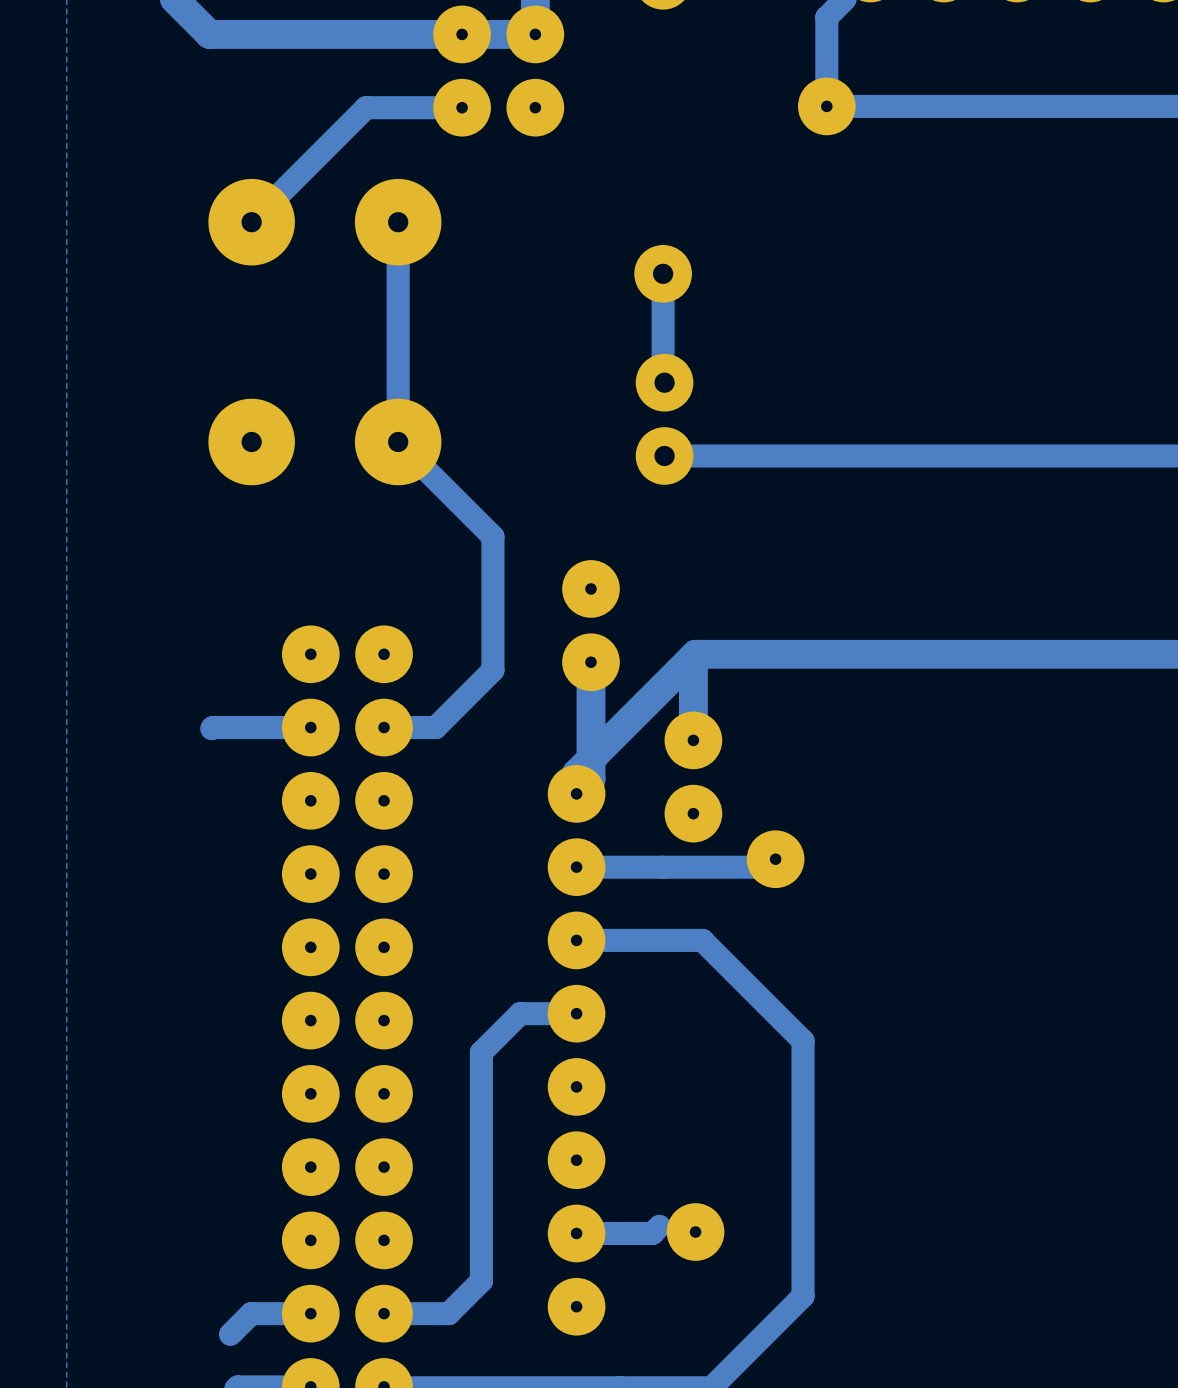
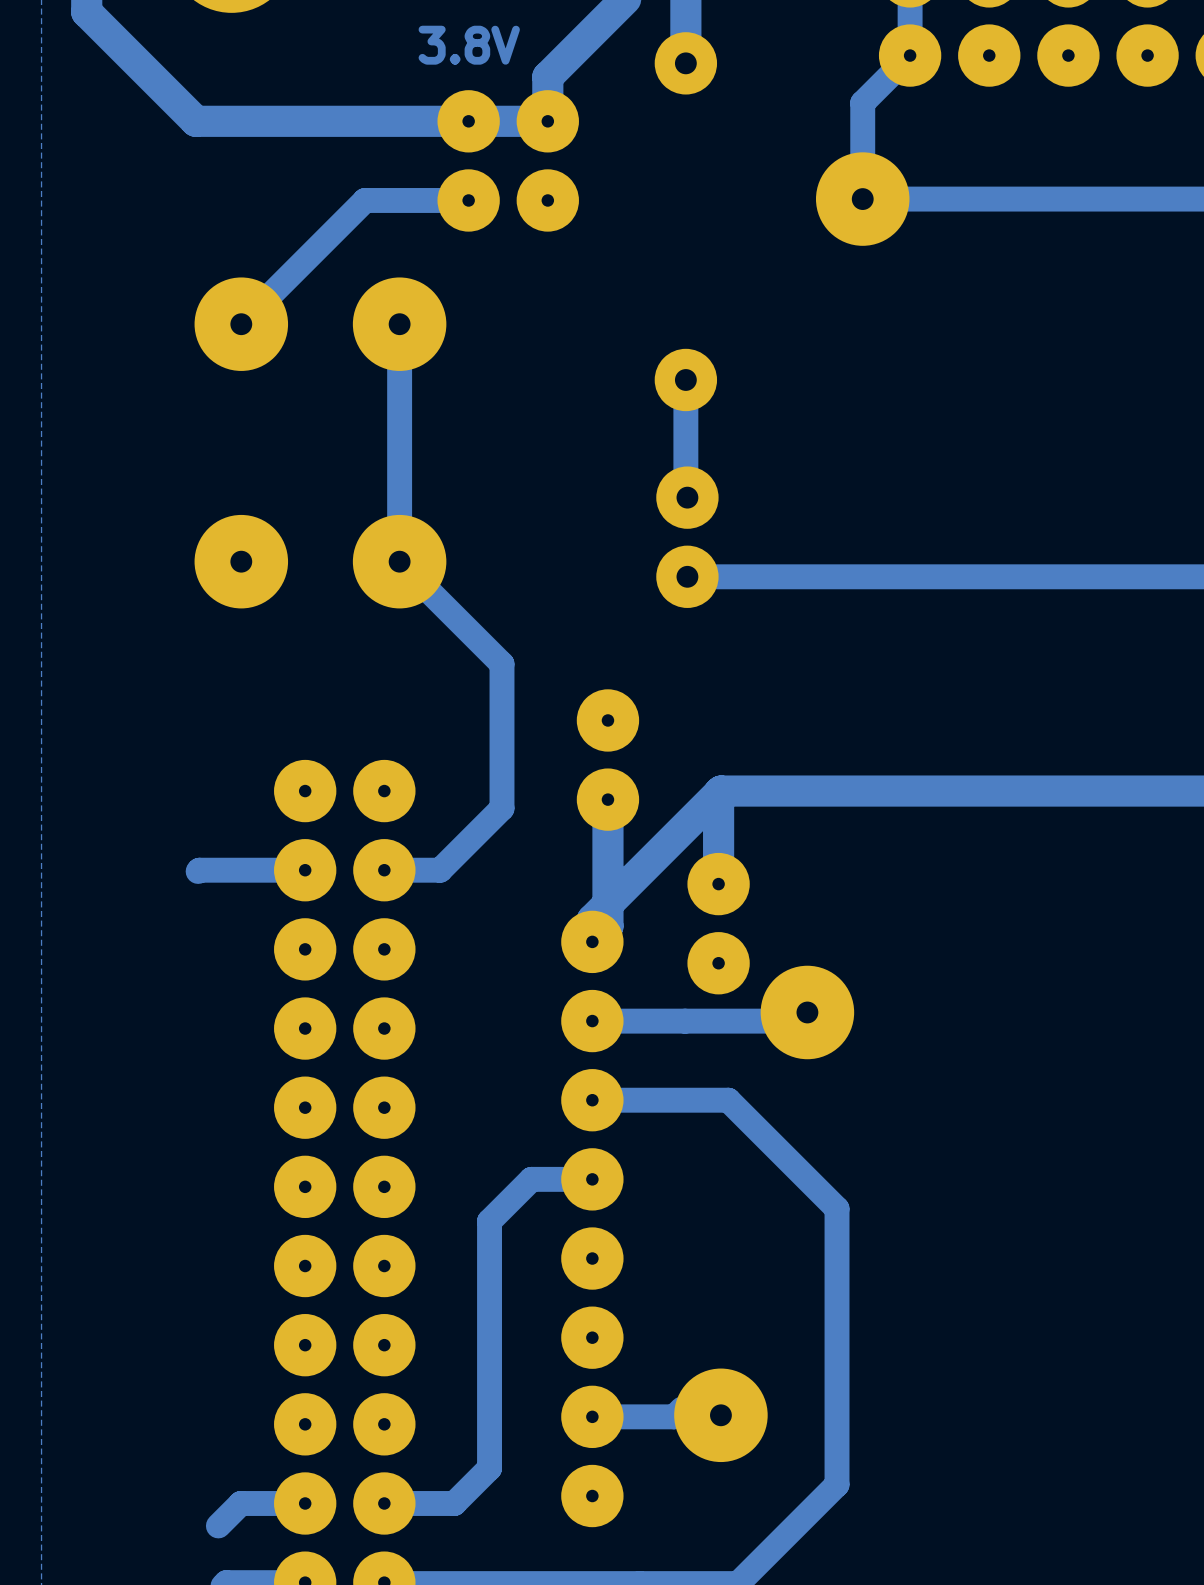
part footprint: [797, 77, 856, 136] -> [815, 152, 910, 246]
part footprint: [746, 830, 805, 889] -> [760, 965, 855, 1060]
part footprint: [666, 1203, 725, 1261] -> [674, 1368, 768, 1463]

